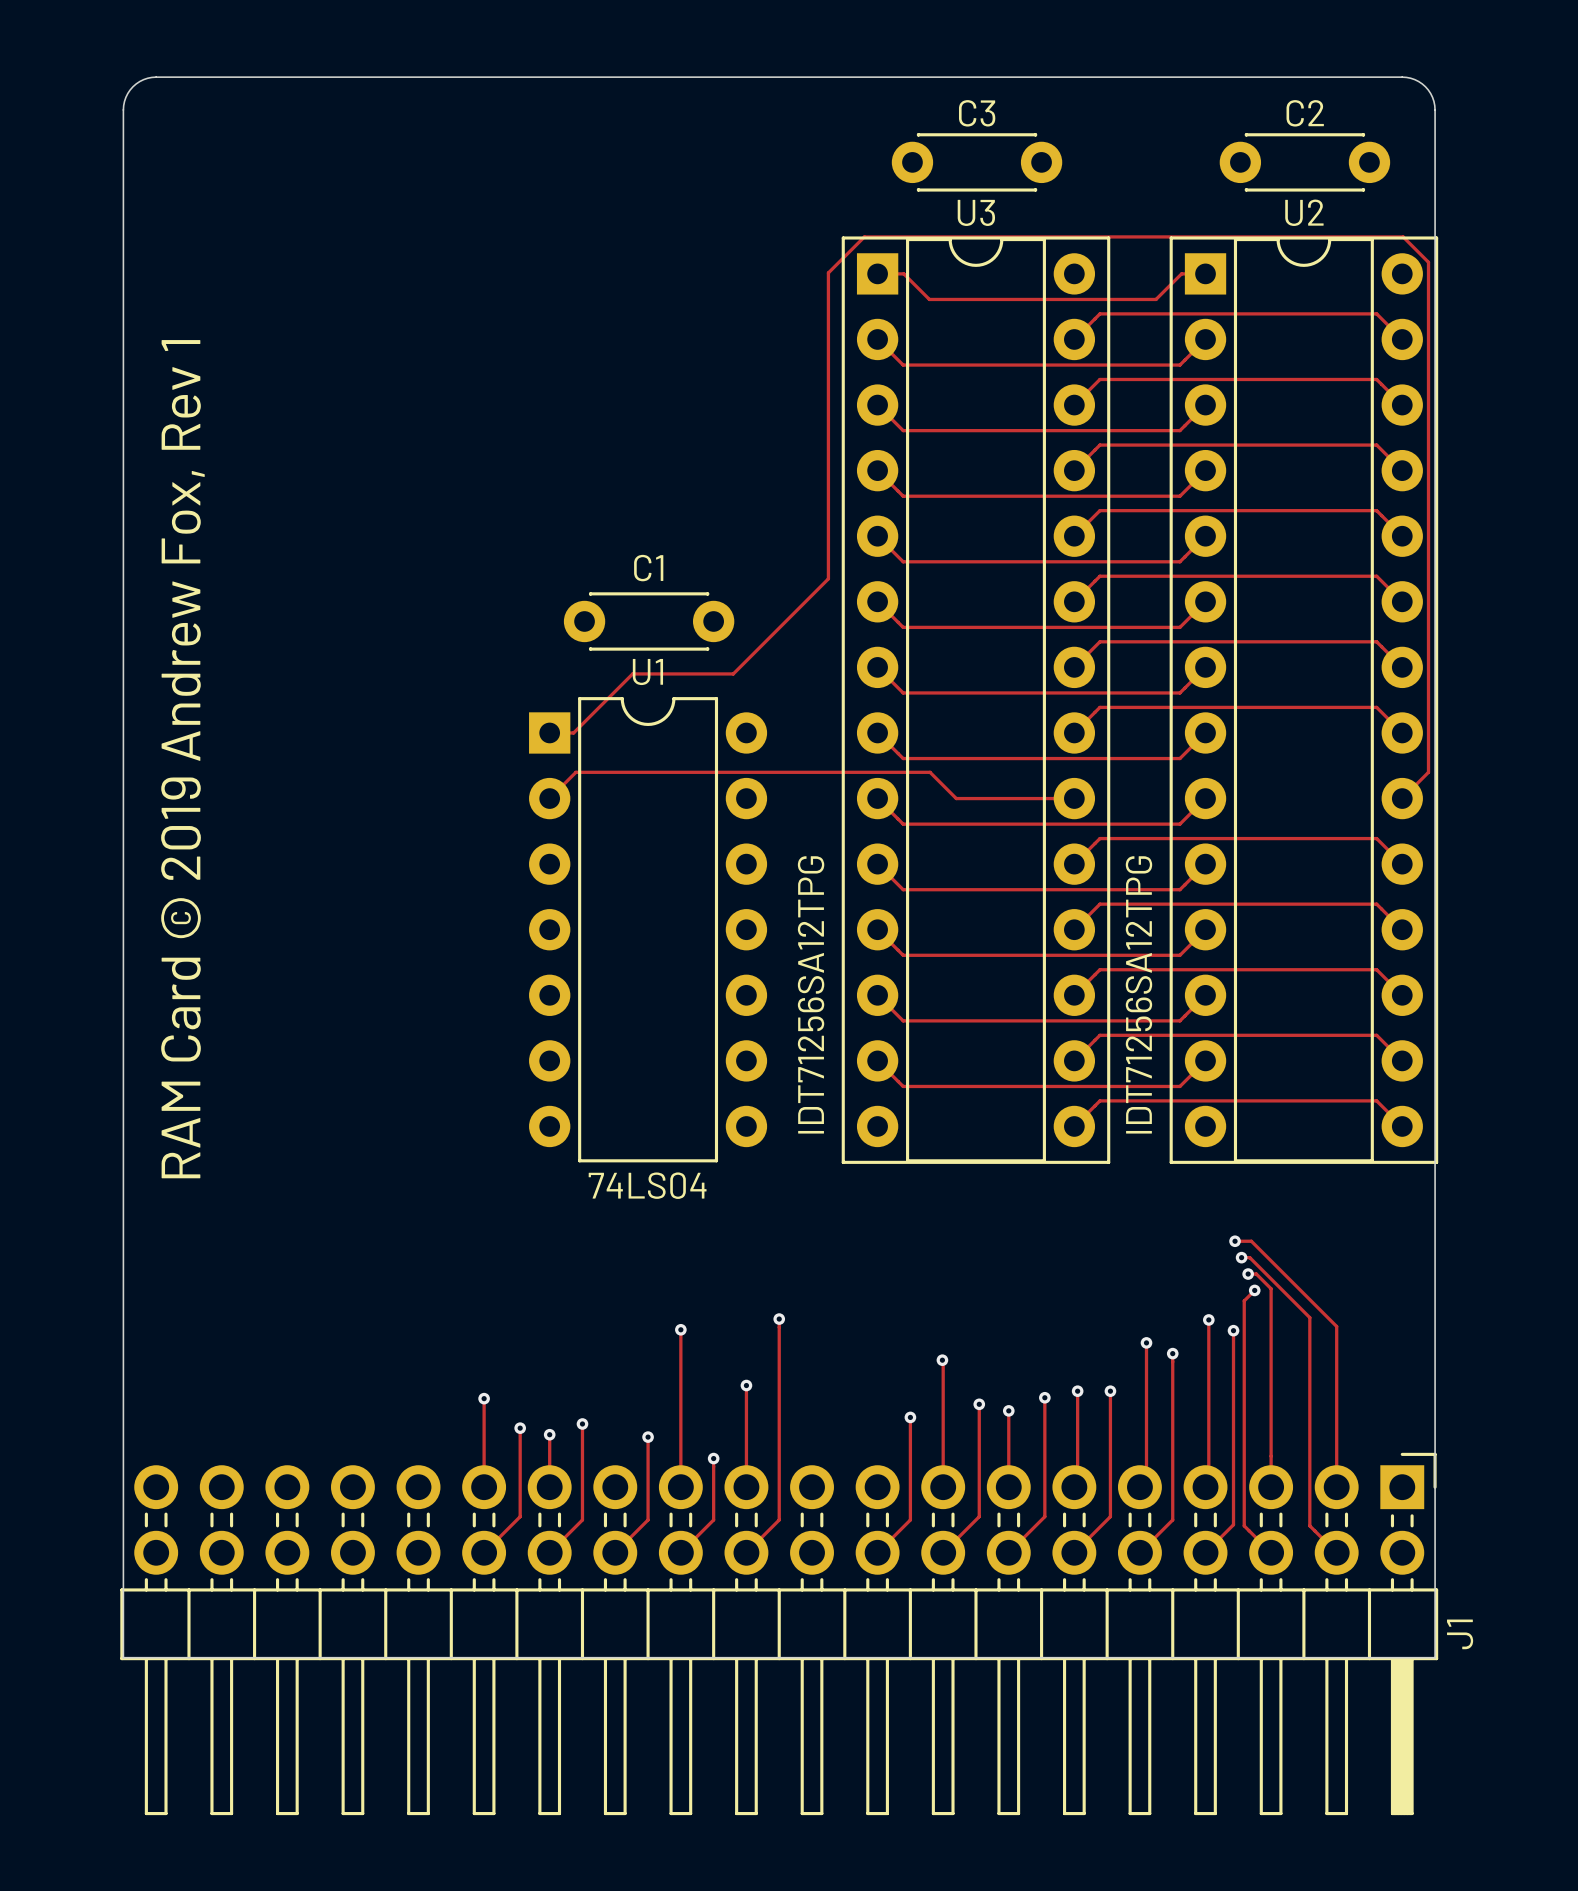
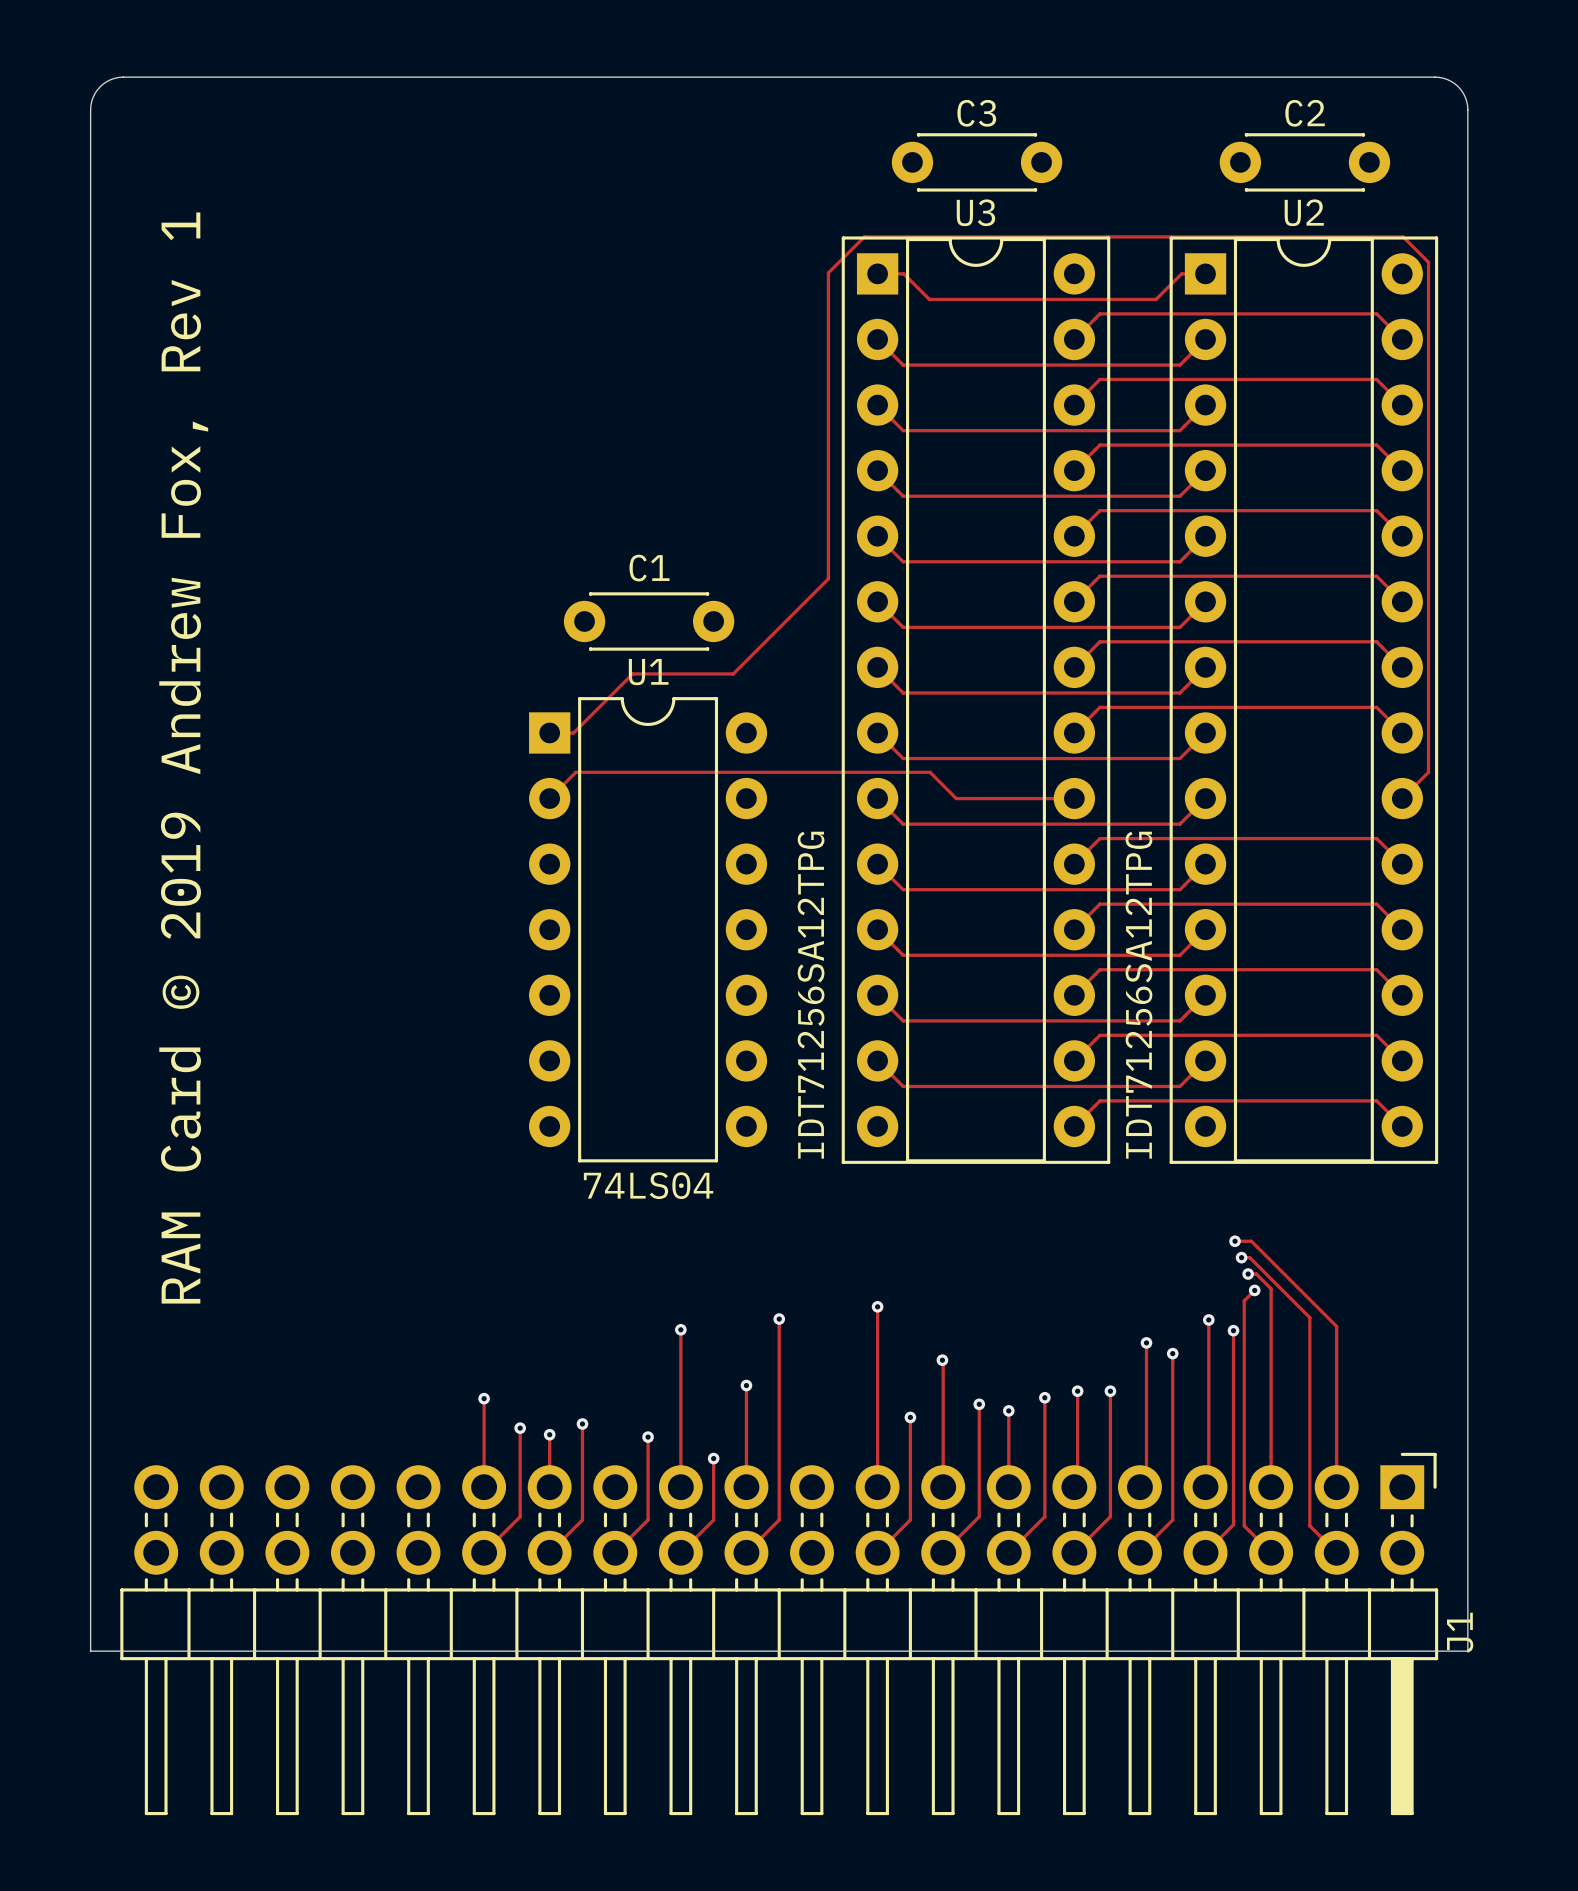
board edge: (156, 77) (143, 79) (133, 86) (125, 97) (123, 109) (123, 1657) (1435, 1657) (1435, 109) (1432, 97) (1425, 86) (1414, 79) (1402, 77) -> (156, 77) (119, 77) (107, 81) (95, 93) (90, 109) (90, 1651) (1467, 1651) (1467, 109) (1463, 93) (1451, 81) (1439, 77) (1402, 77)
track: none -> (877, 1306) (877, 1487)
via: none -> (877, 1306)

